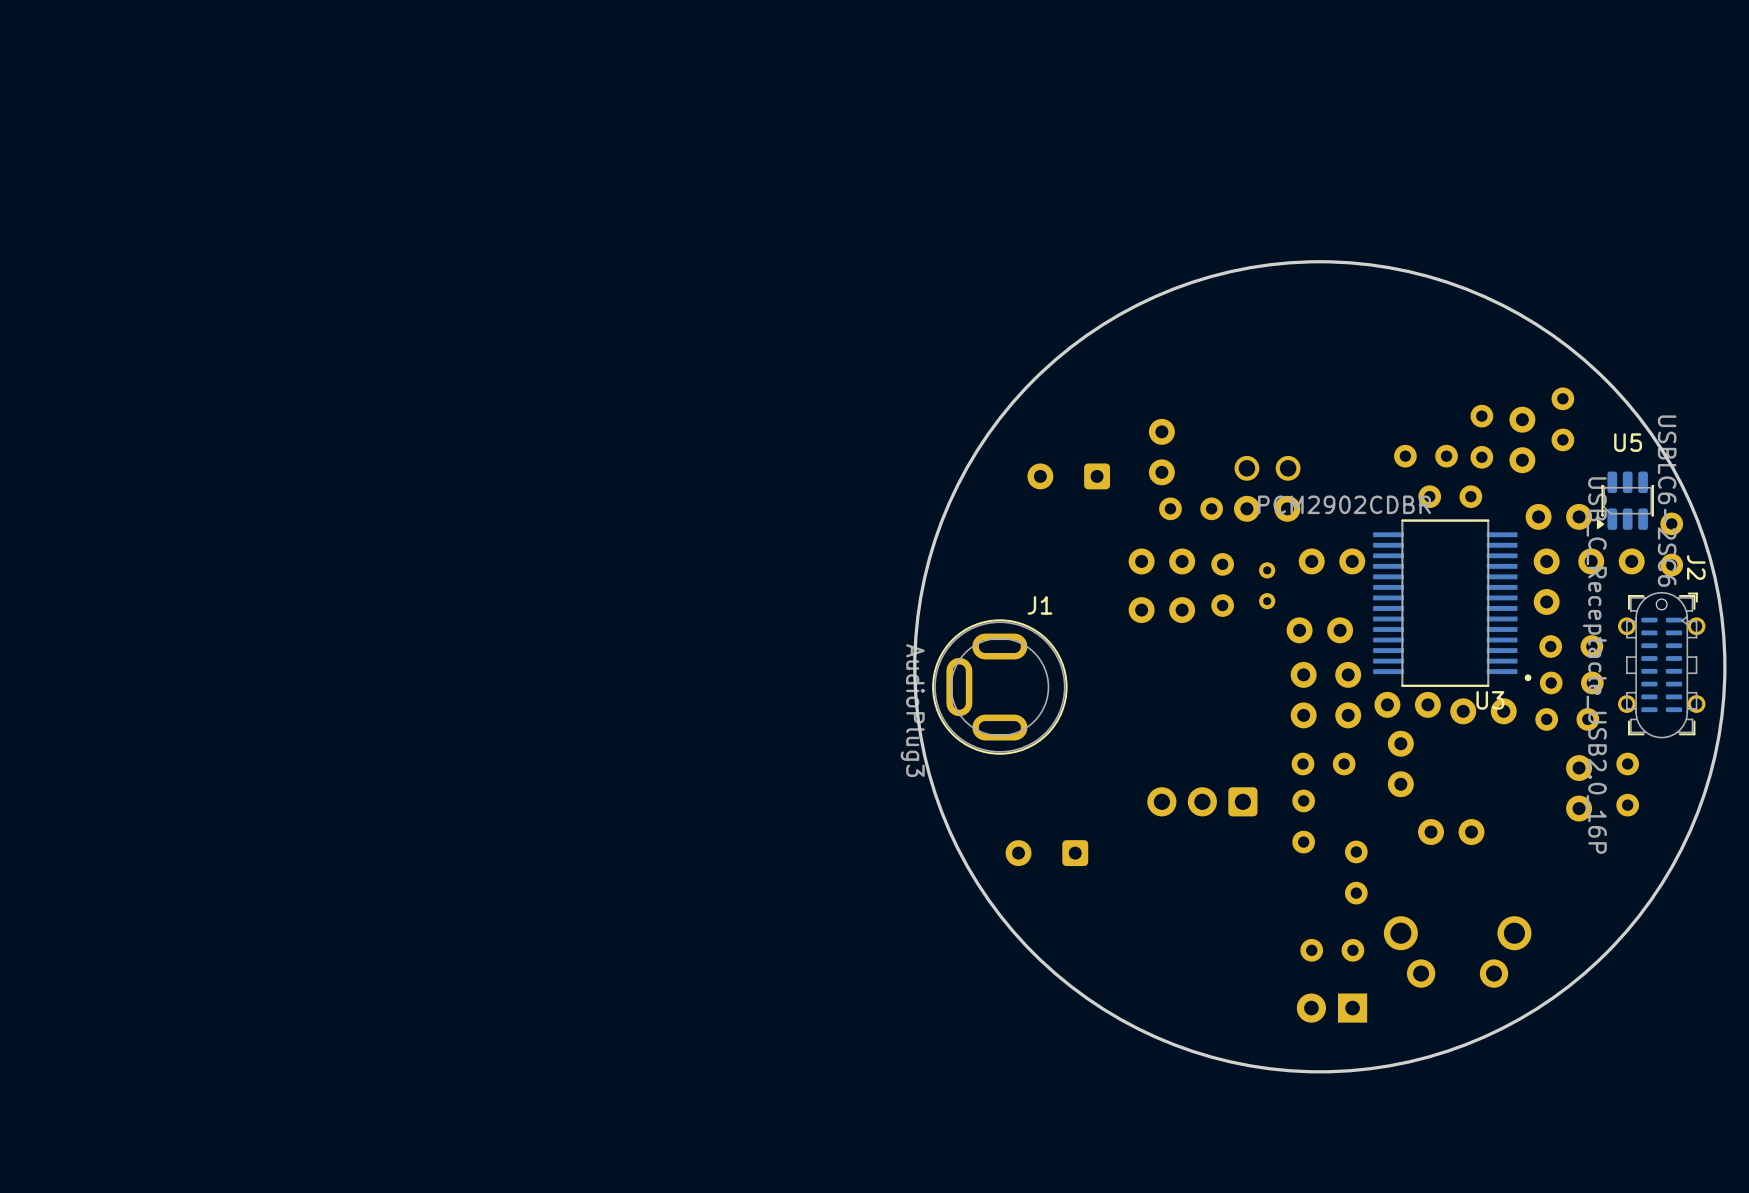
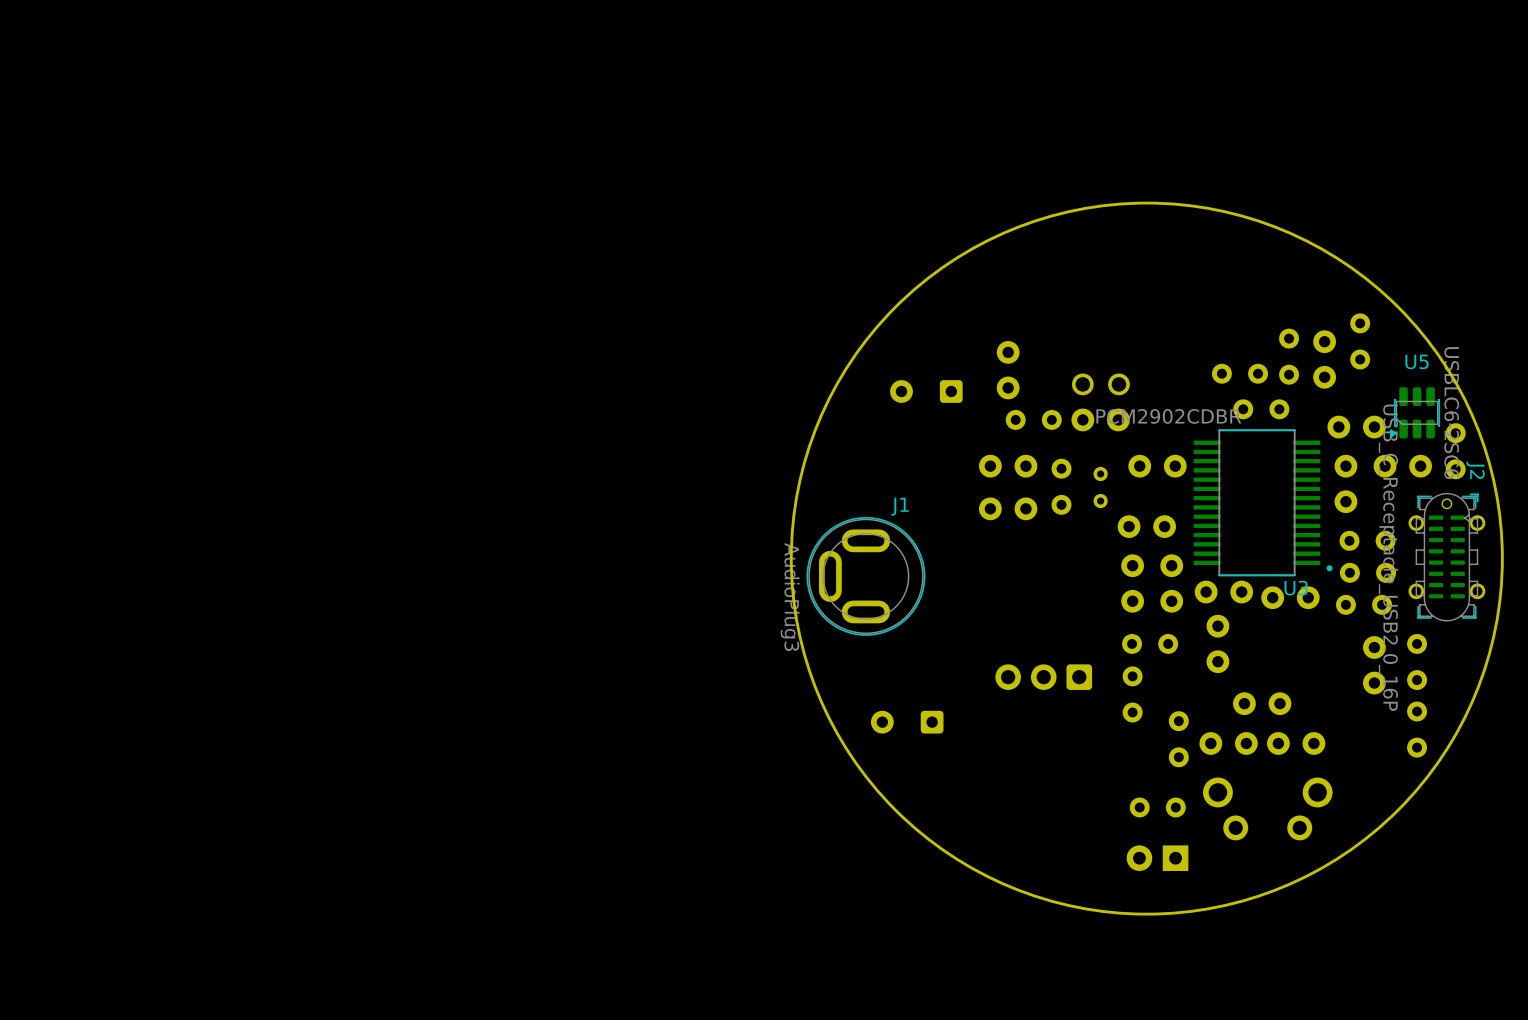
part: none -> (1417, 729)
part: none -> (1228, 743)
part: none -> (1296, 743)

